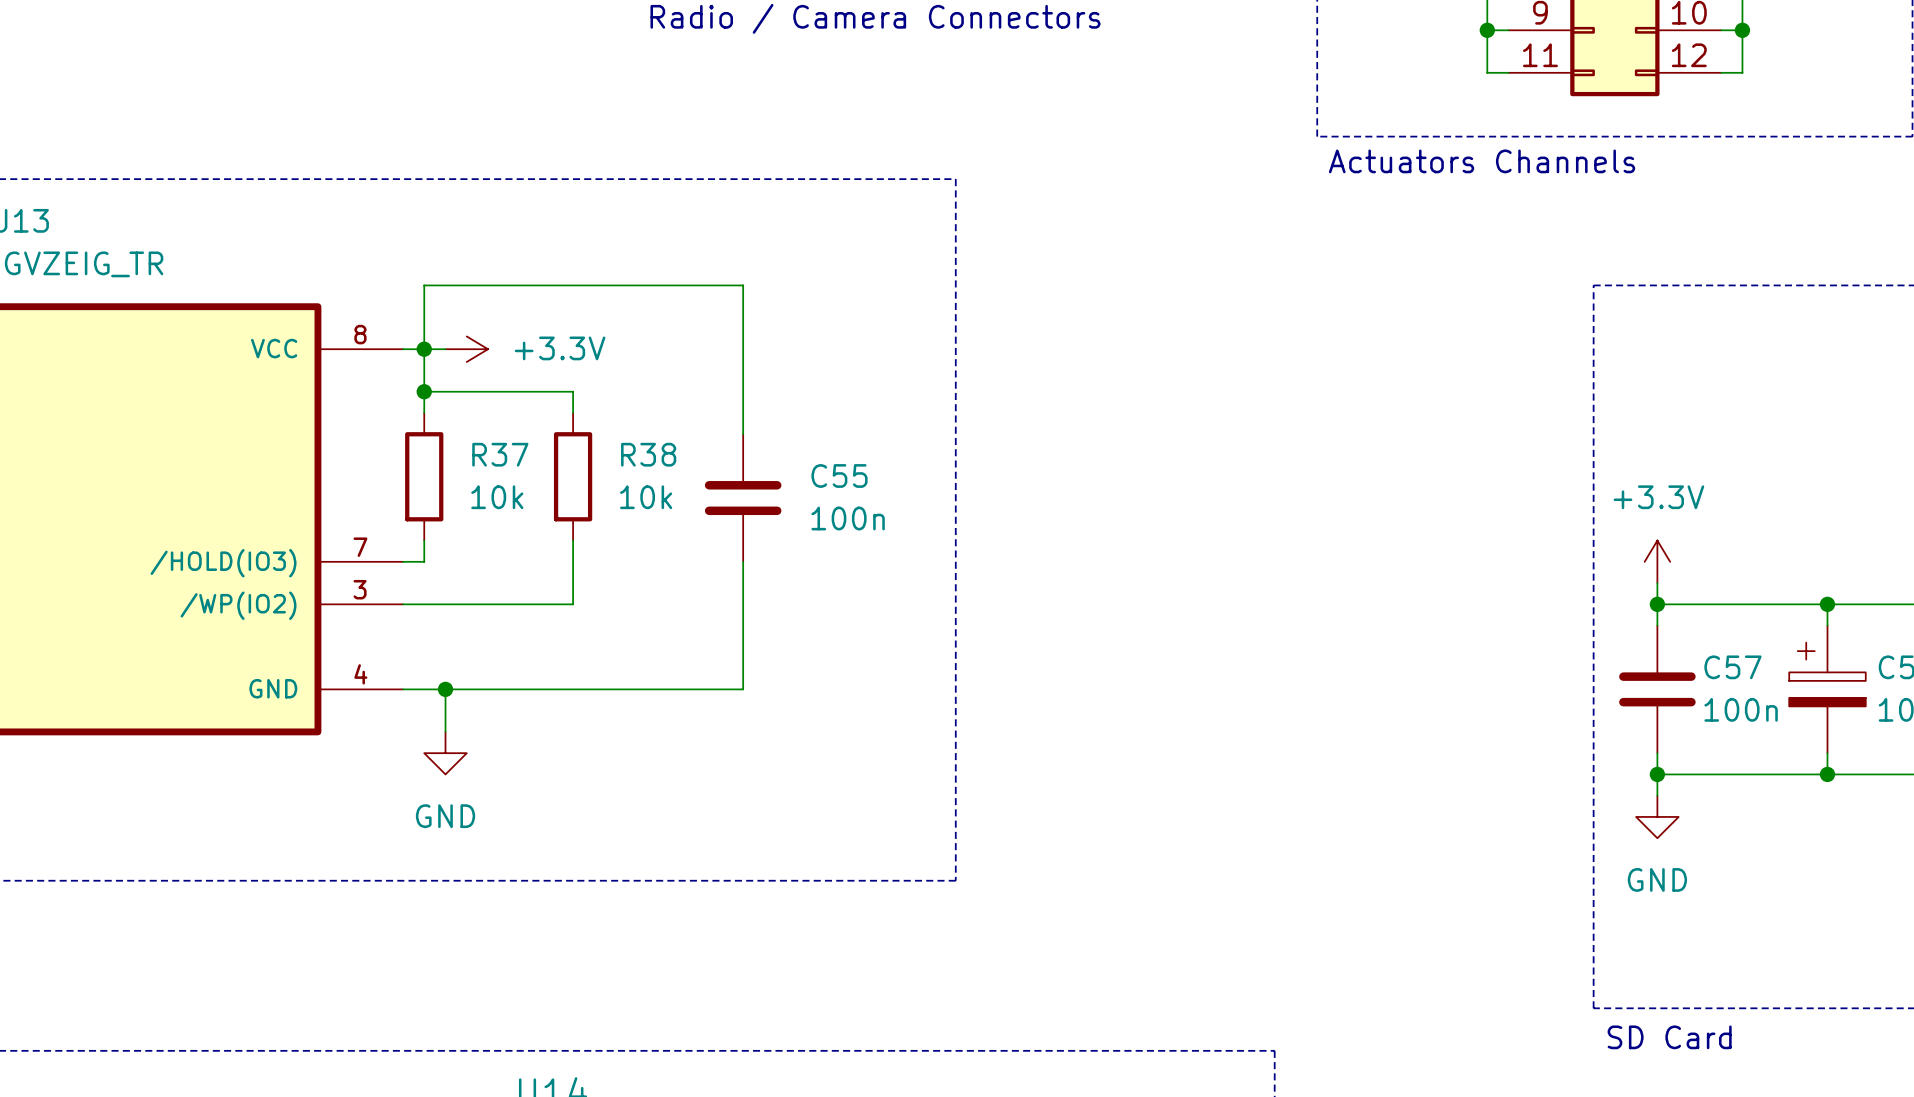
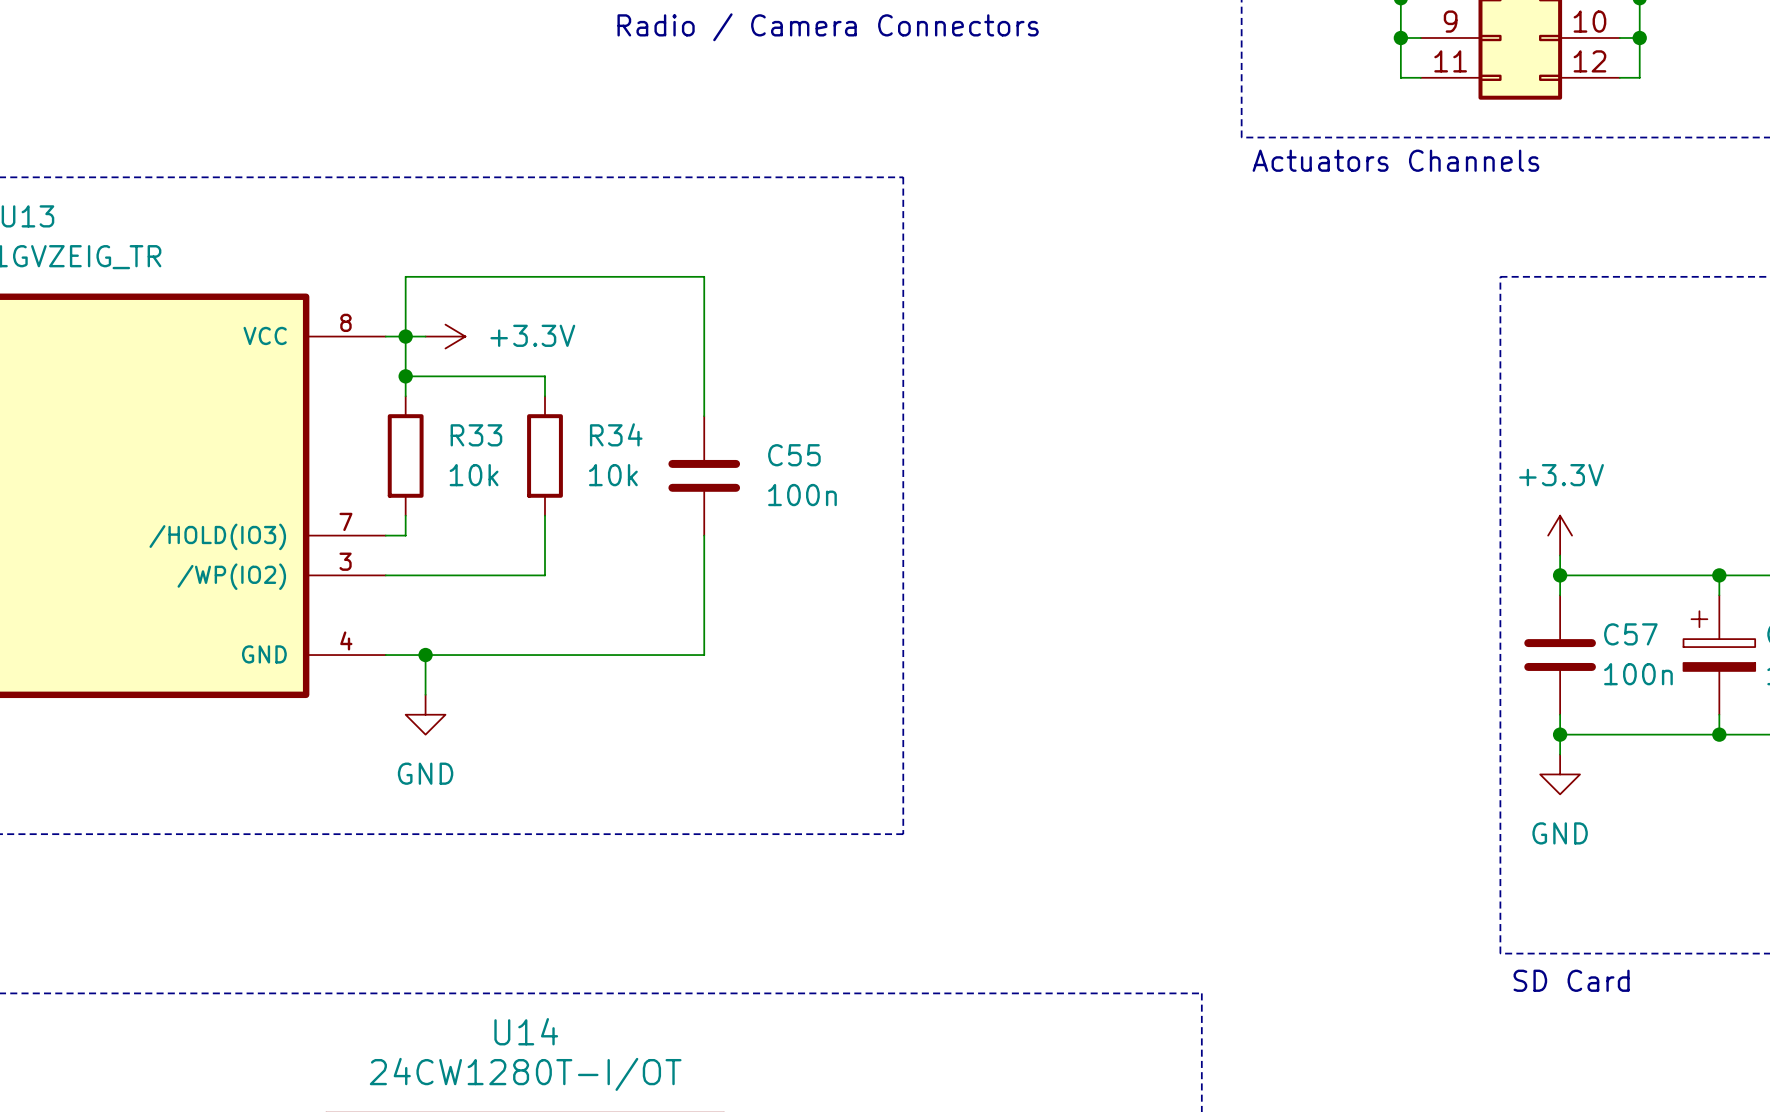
R37 name: R37 (500, 454) -> R33 (476, 435)
R38 name: R38 (648, 454) -> R34 (616, 434)

